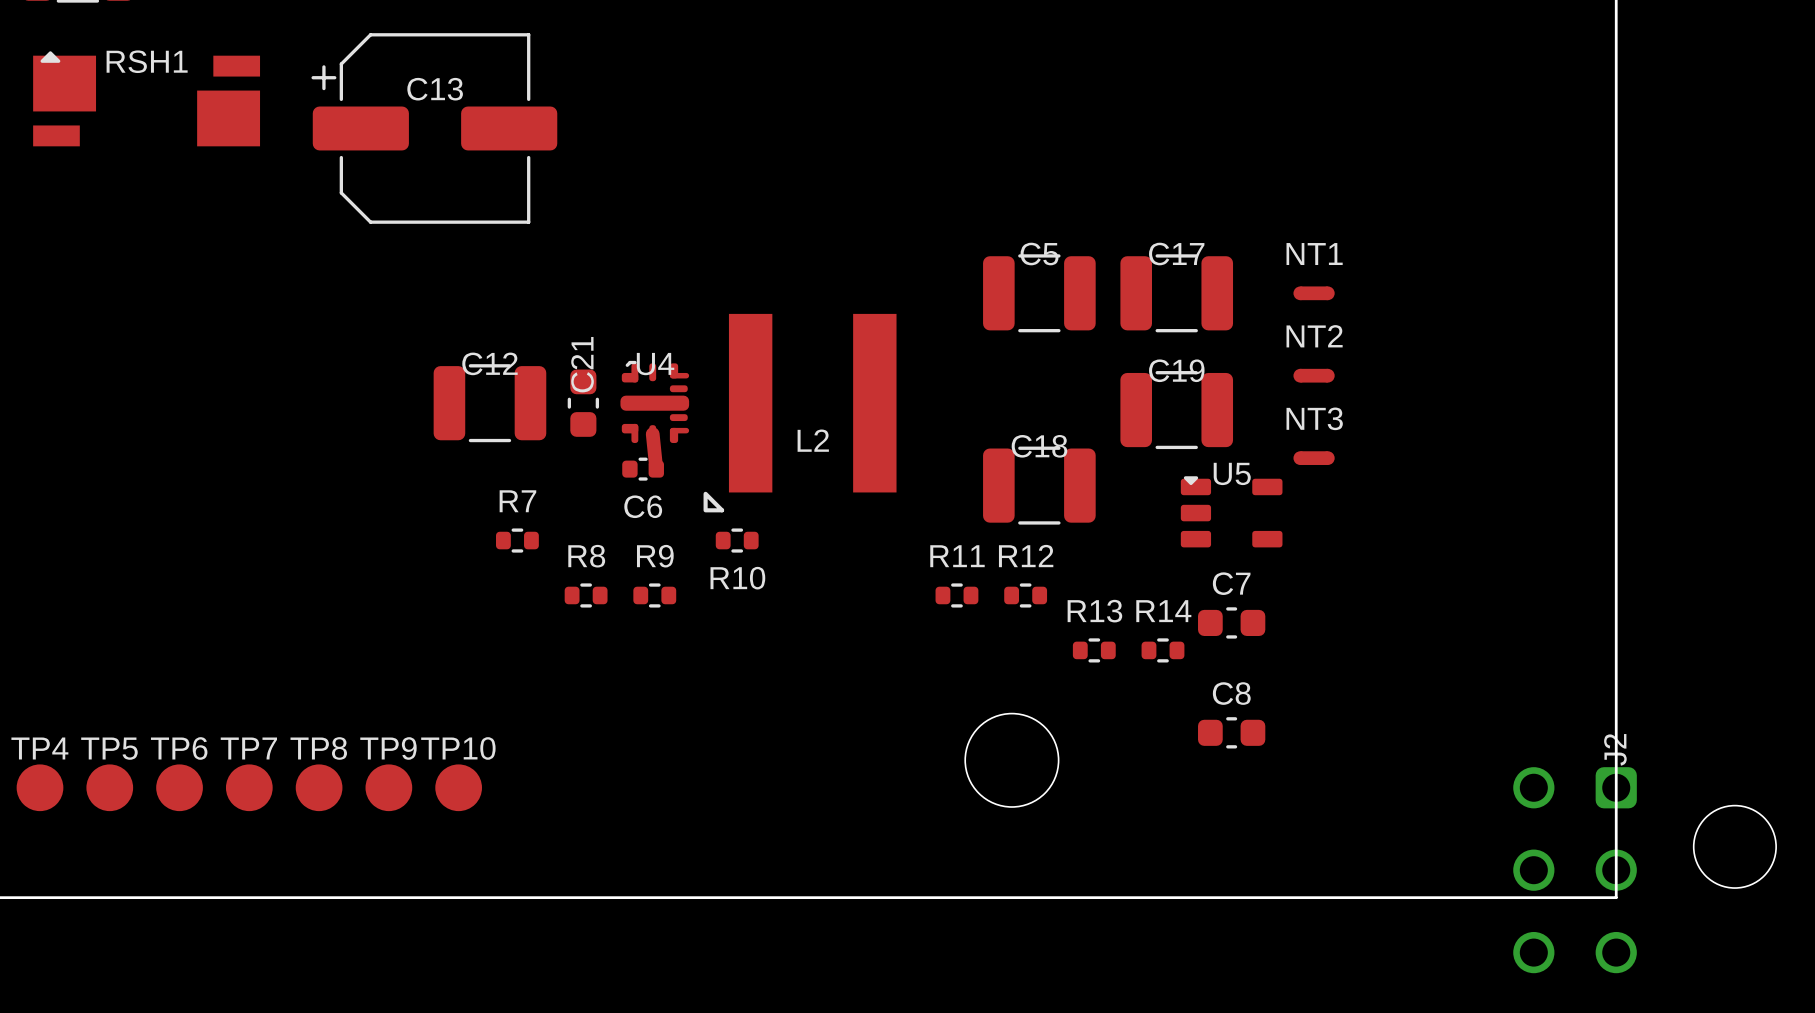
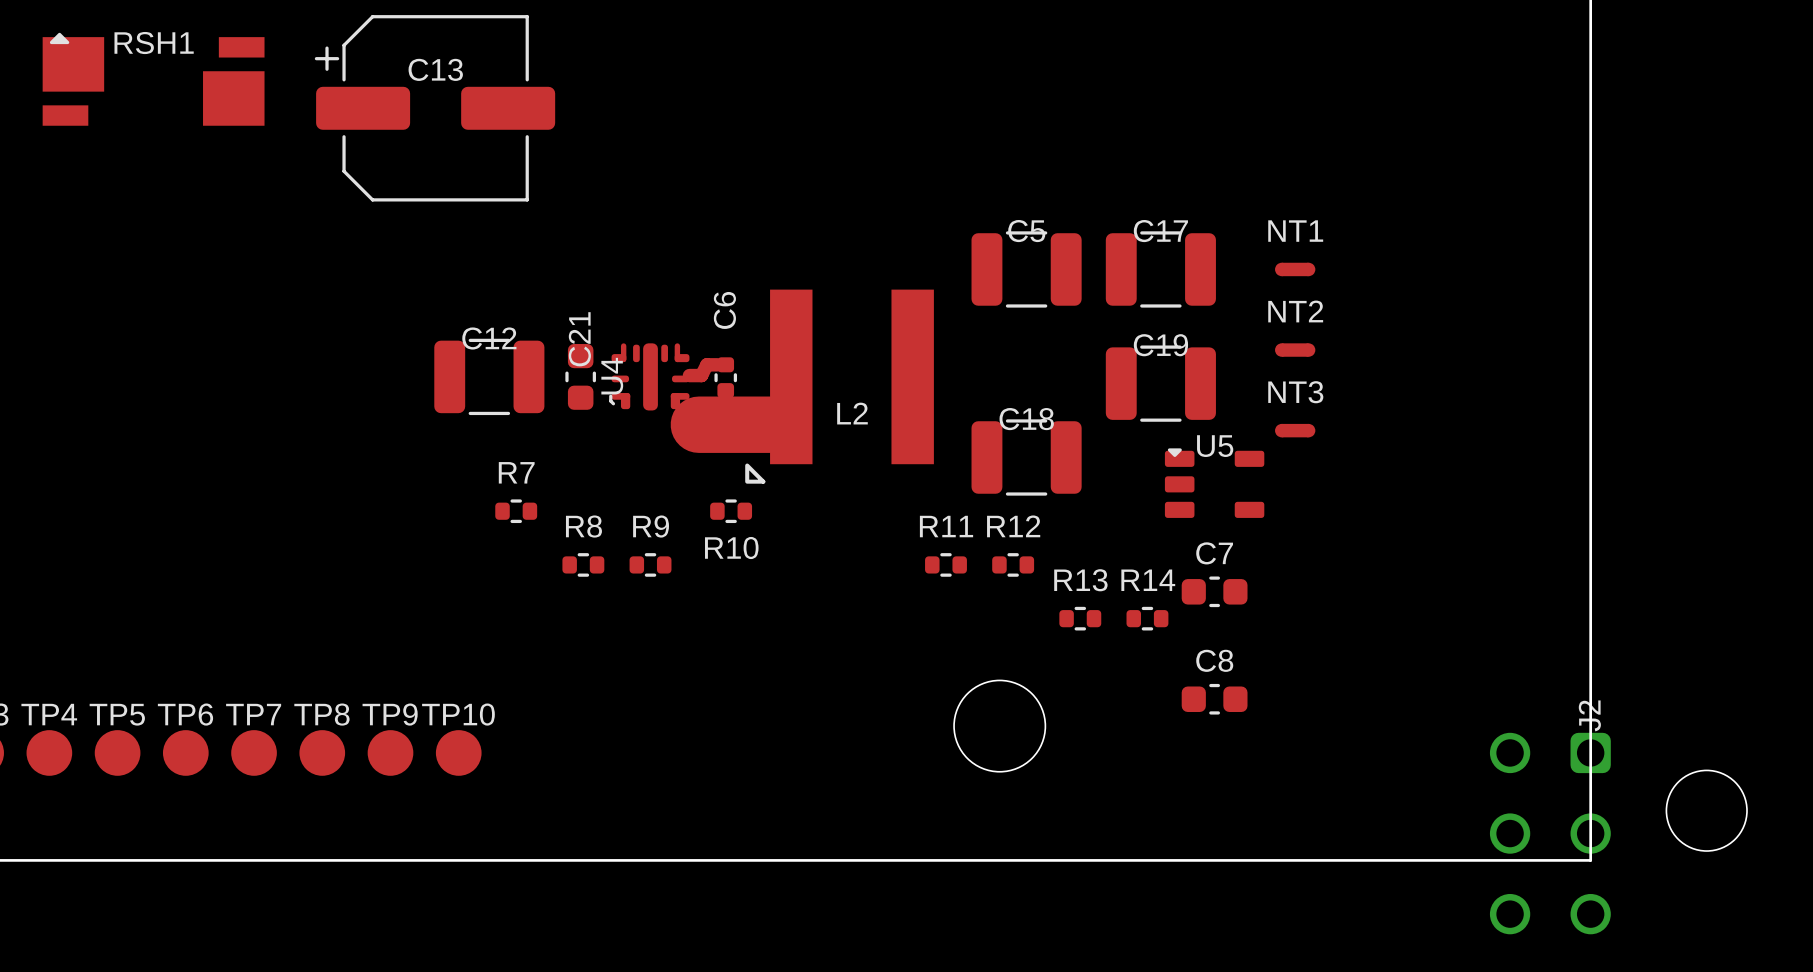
track: none -> (717, 364) (706, 364) (701, 375) (689, 375)
U4 rotation: 0° (654, 401) -> 90° counterclockwise (649, 376)
L2 position: (800, 413) -> (839, 386)
track: (652, 434) (656, 469) -> none
track: none -> (698, 424) (770, 424)
C6 rotation: 0° (643, 469) -> 90° clockwise (725, 377)
C6 position: (643, 469) -> (725, 377)
C6 name position: C6 (643, 506) -> C6 (724, 310)

